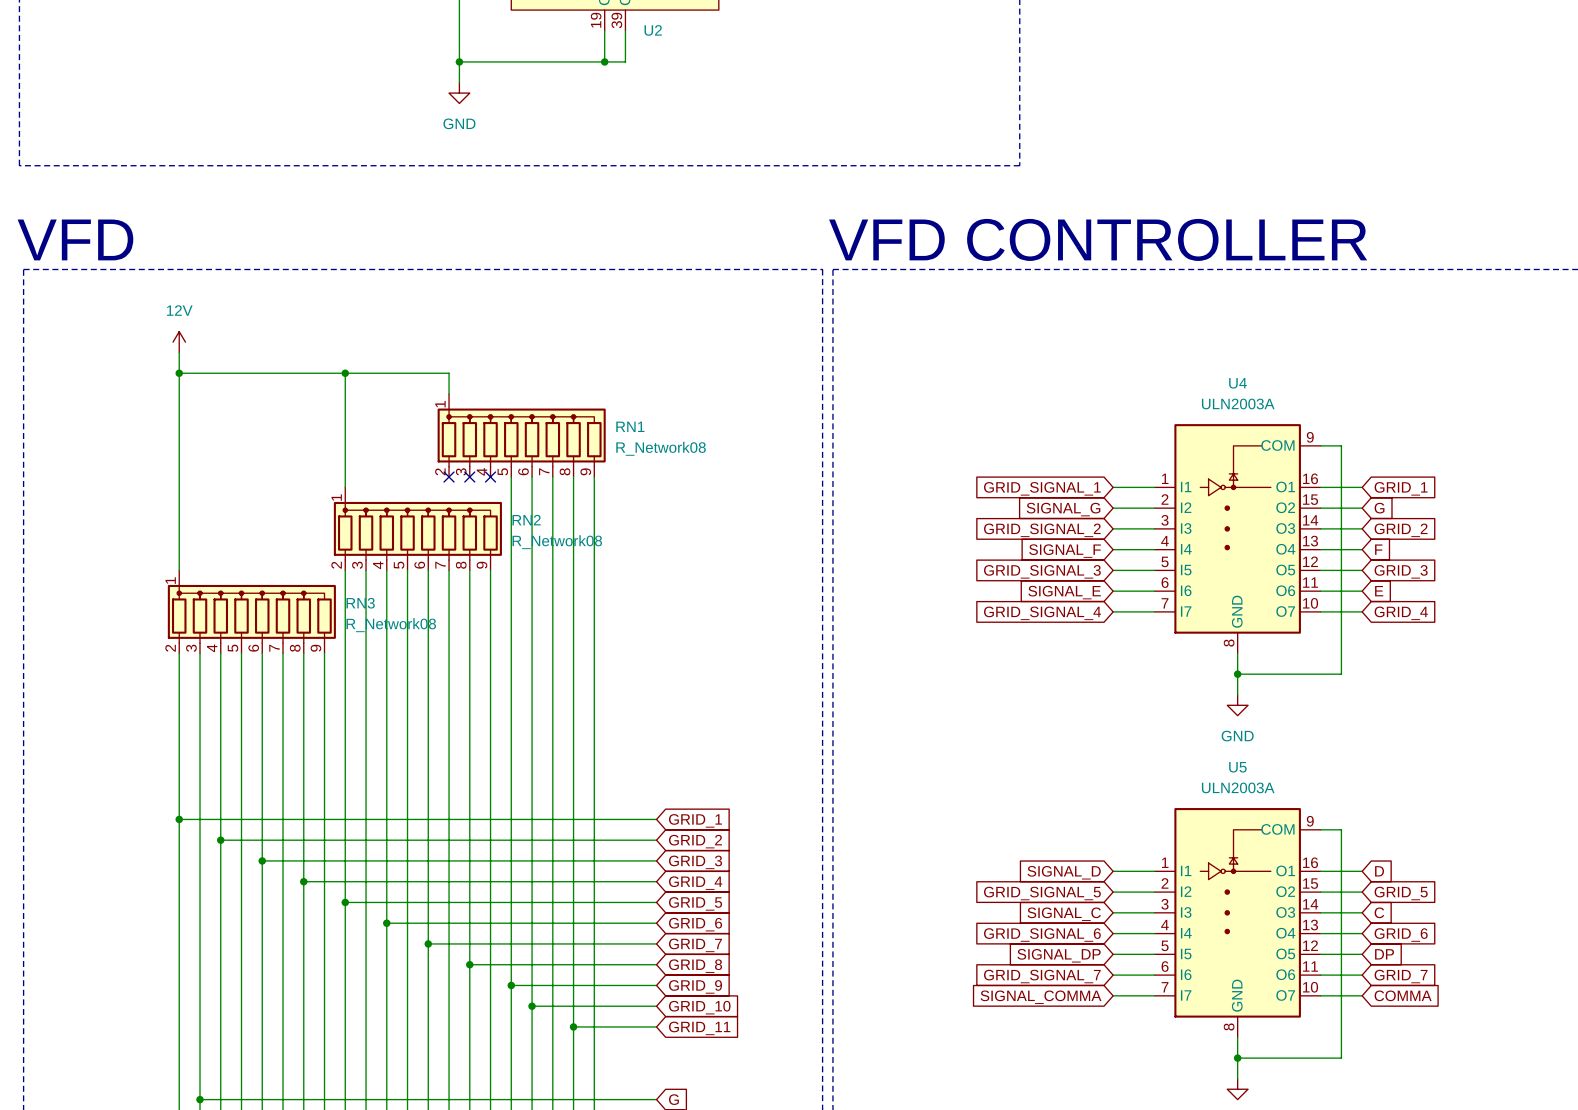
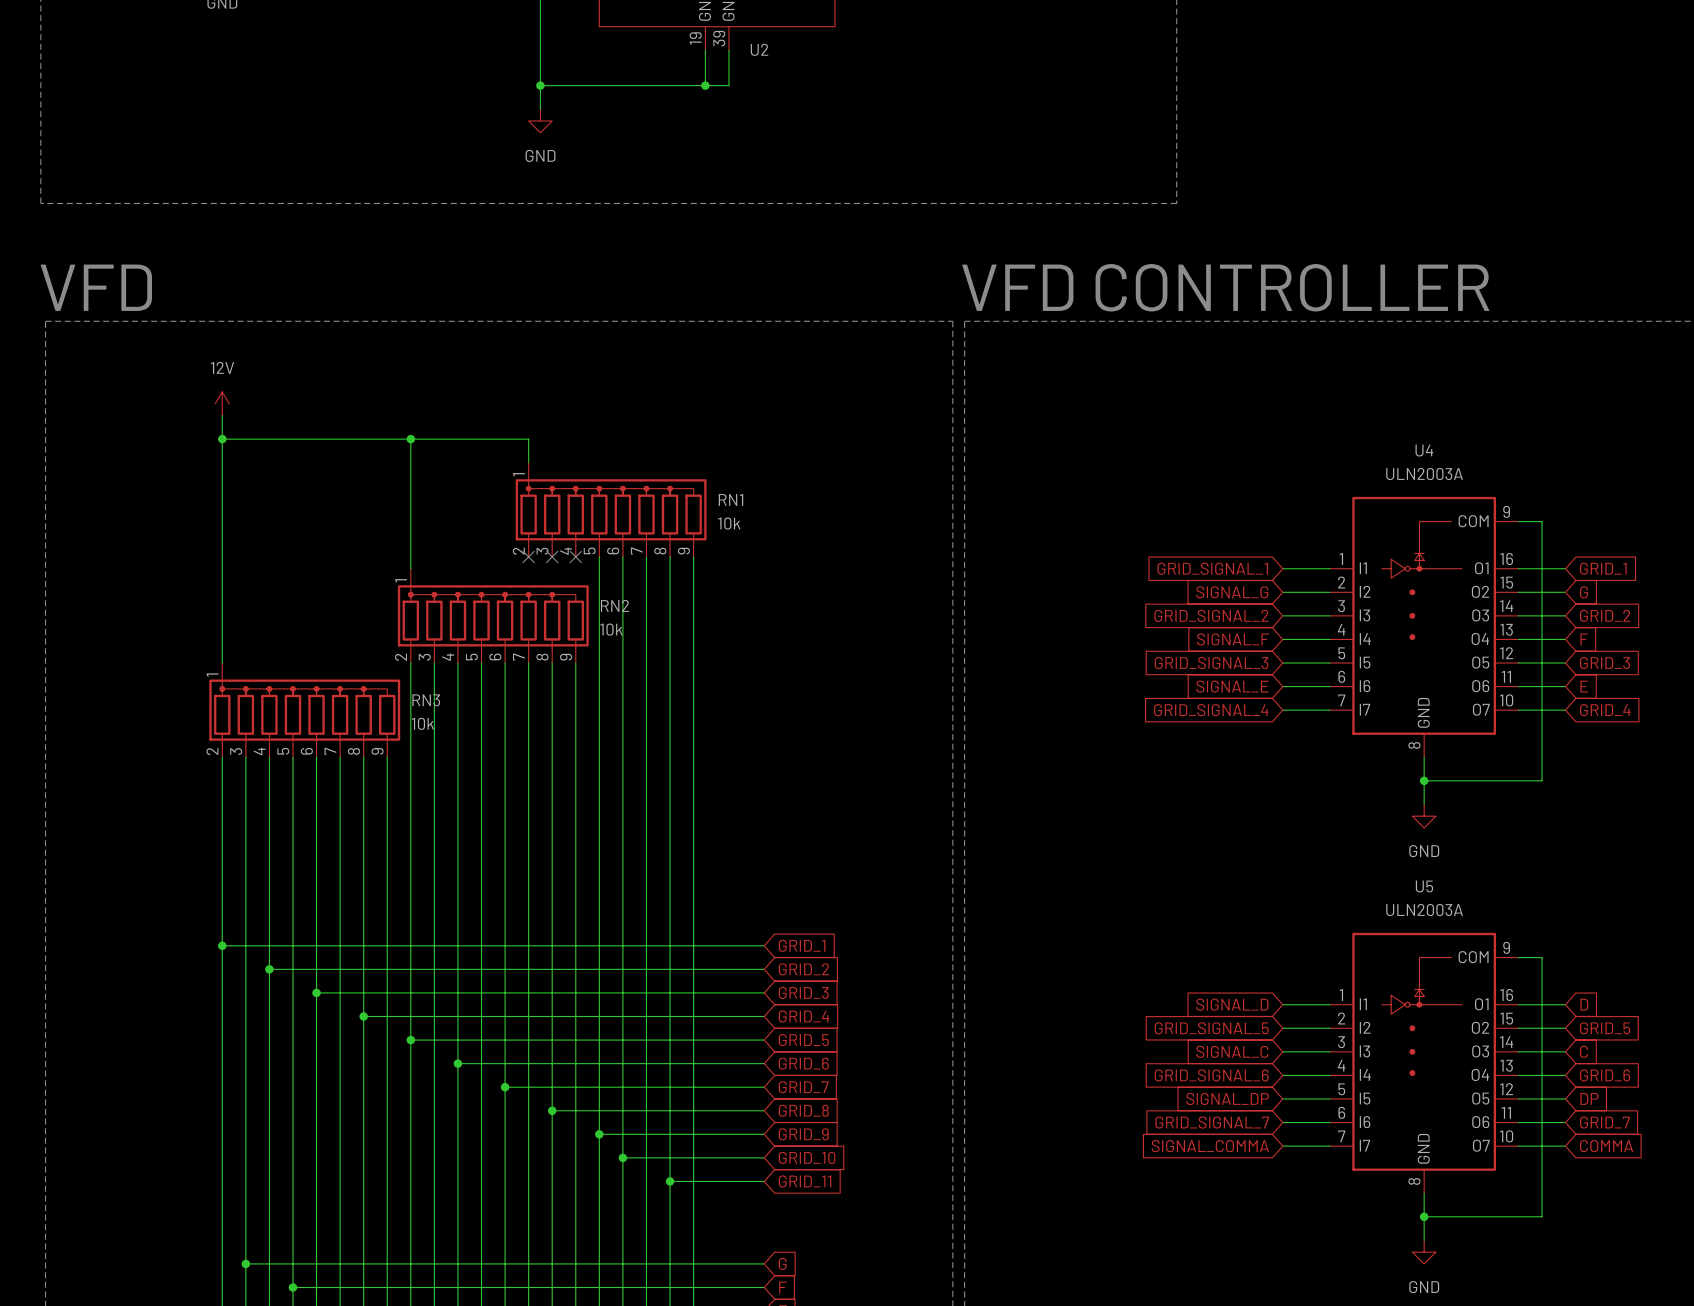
RN1 value: R_Network08 (661, 448) -> 10k (729, 523)
RN2 value: R_Network08 (557, 542) -> 10k (611, 629)
RN3 value: R_Network08 (391, 625) -> 10k (422, 723)

